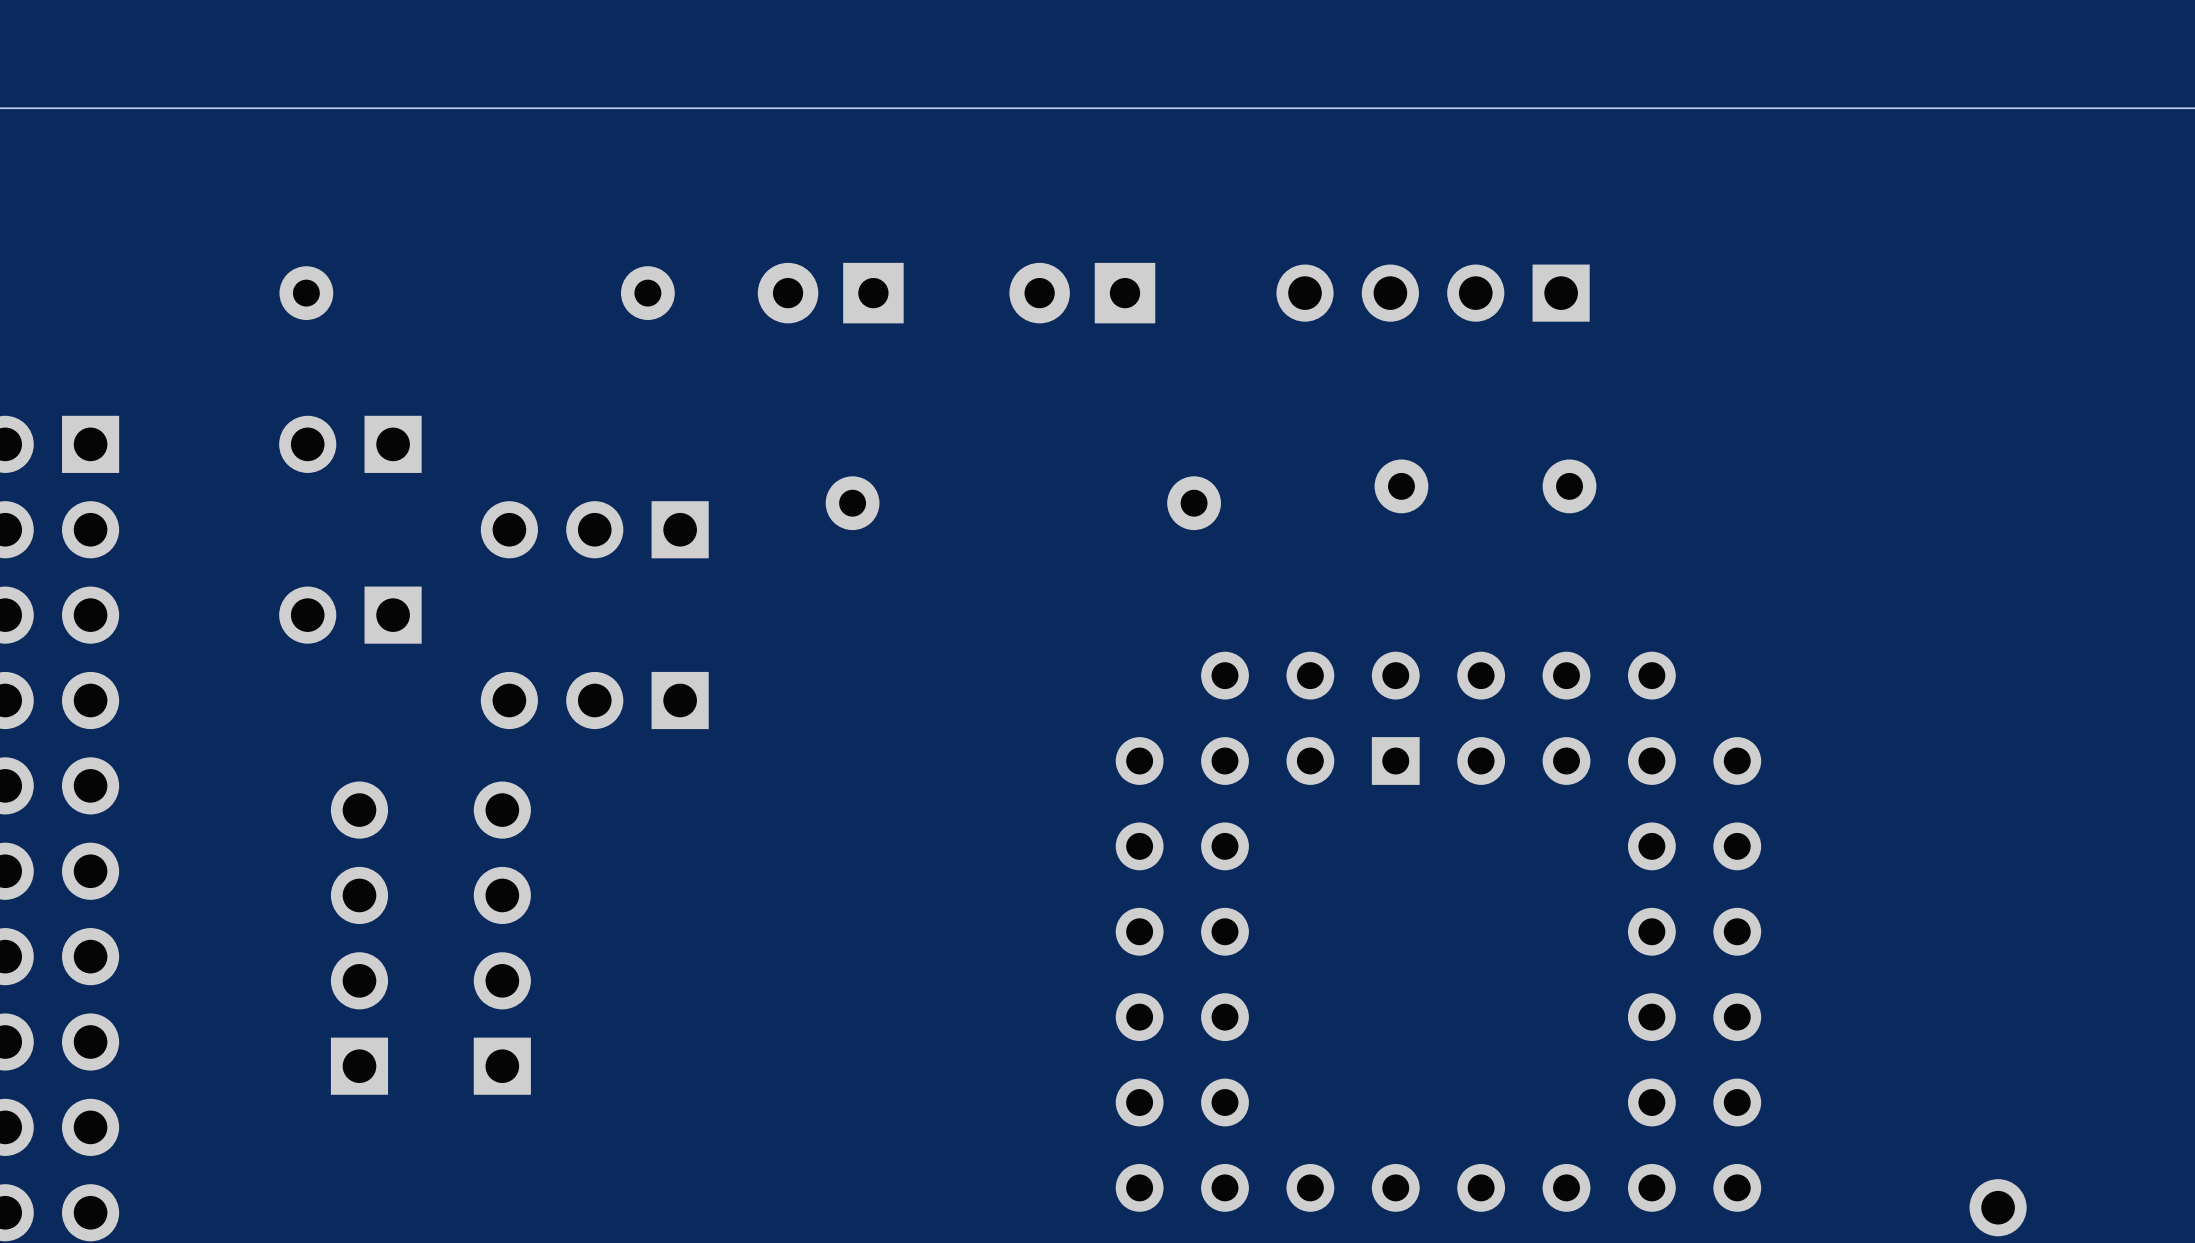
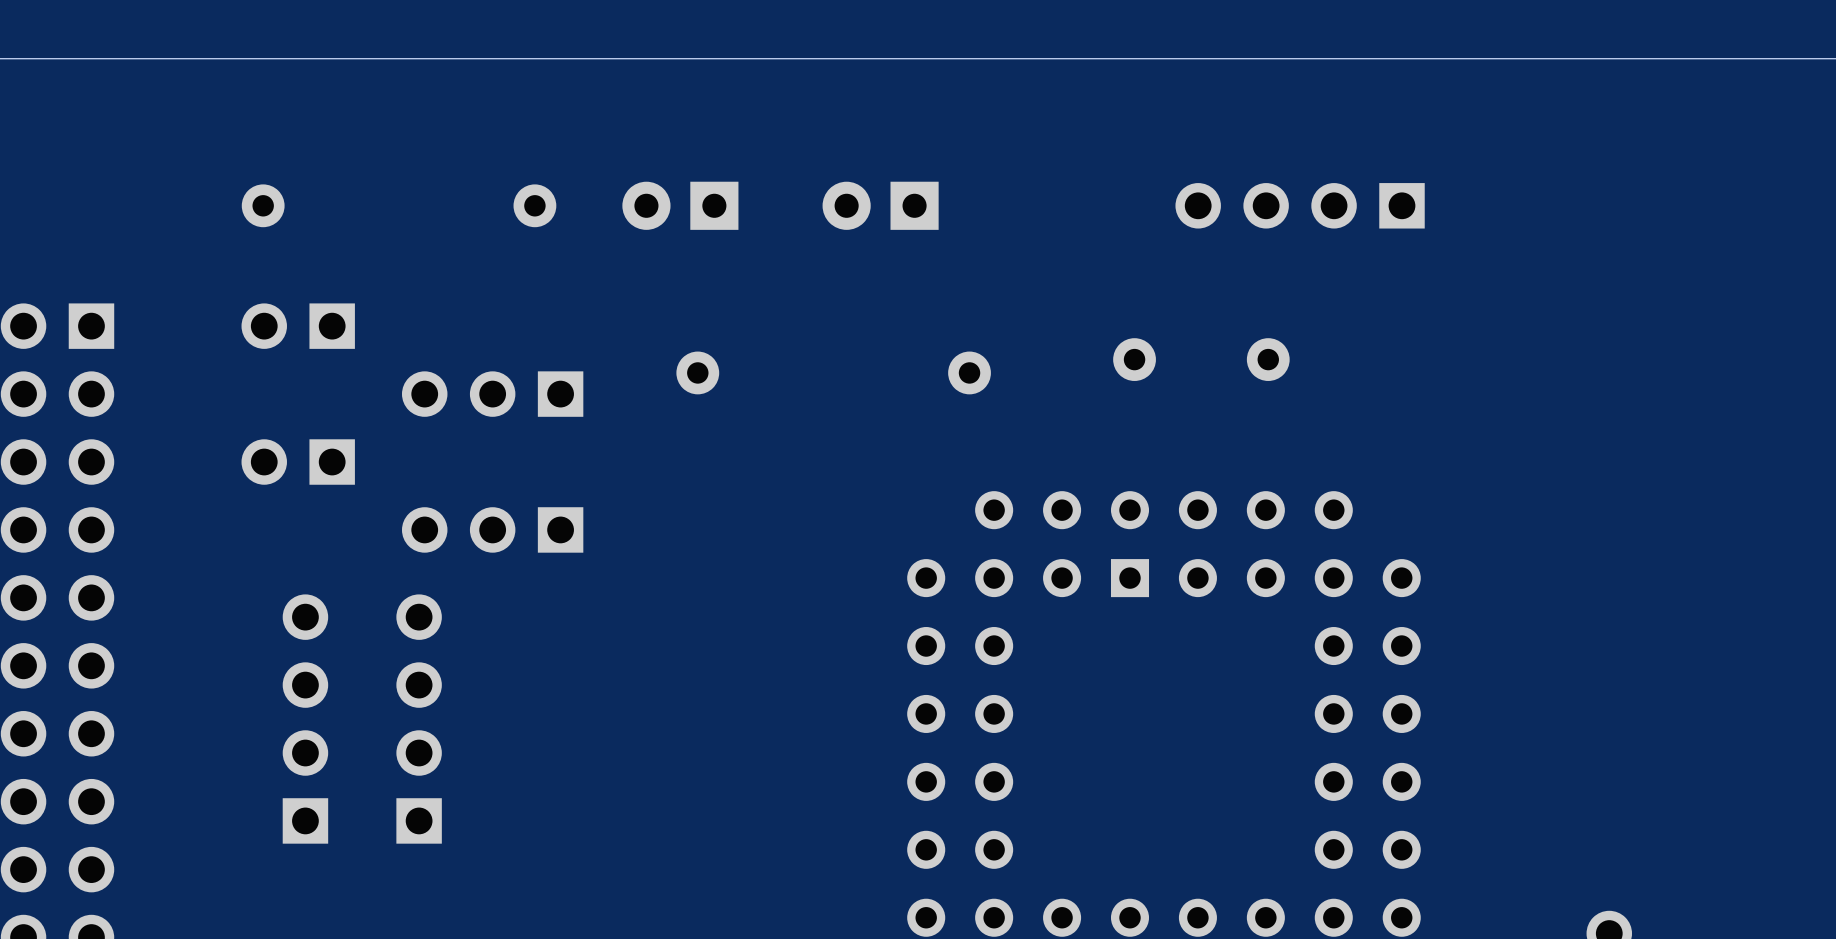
part position: (1433, 293) -> (1300, 205)

